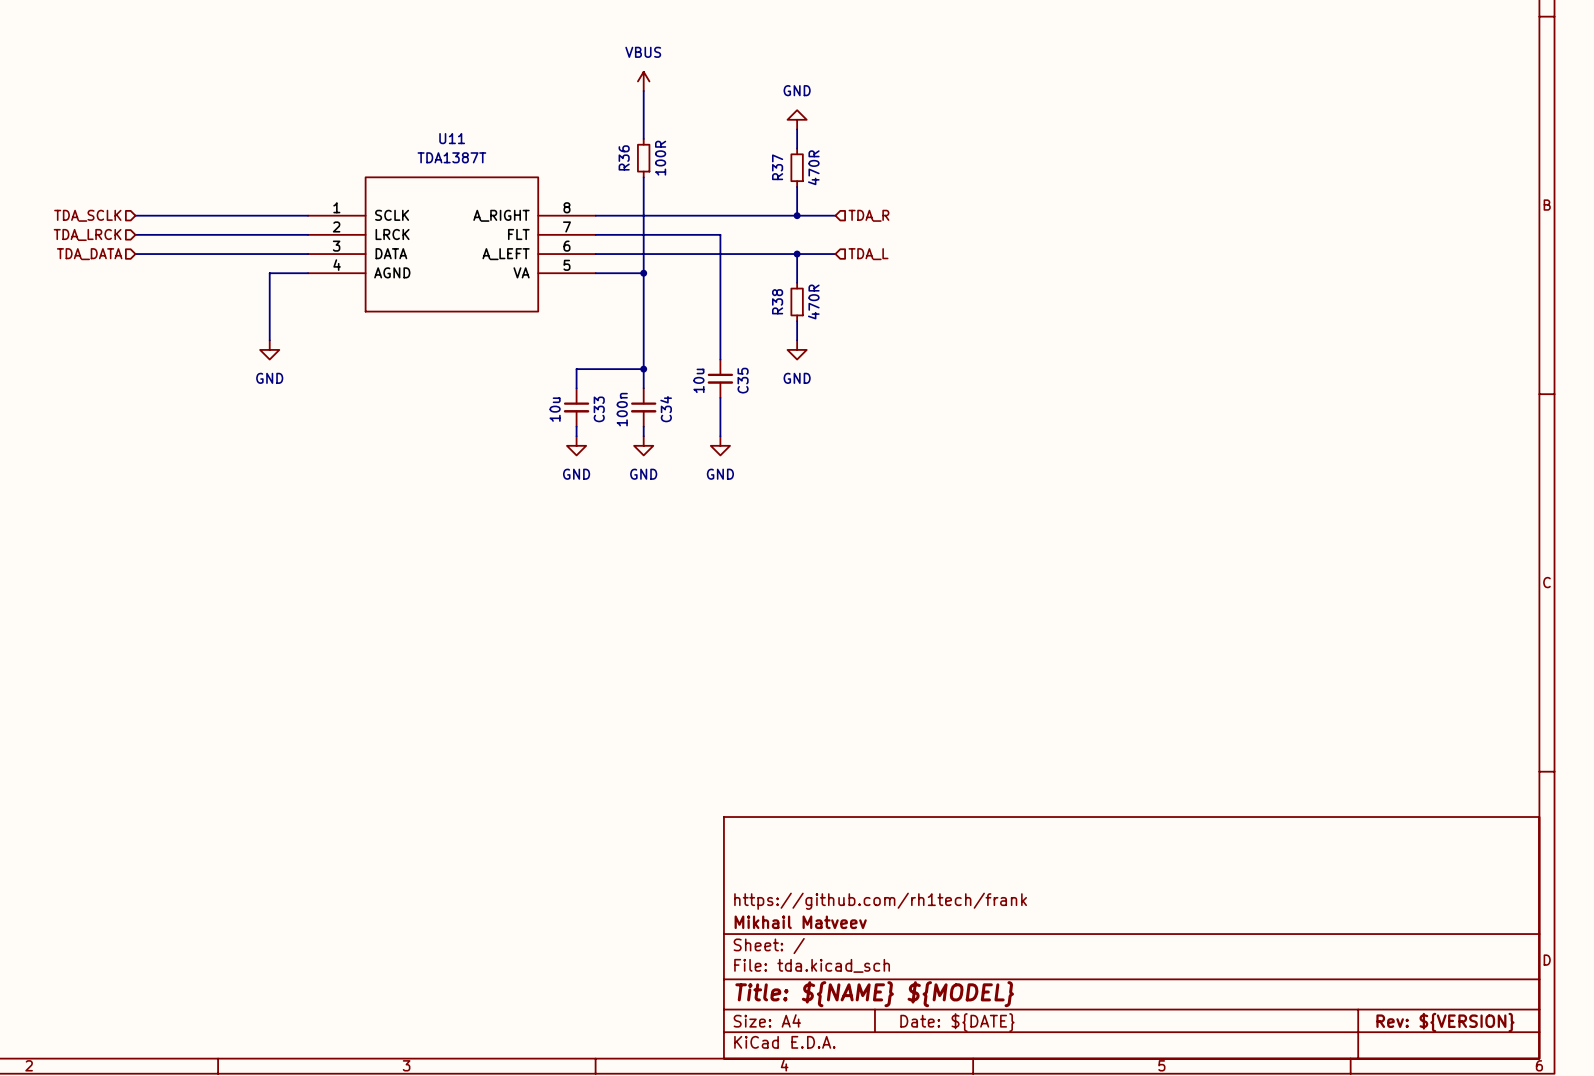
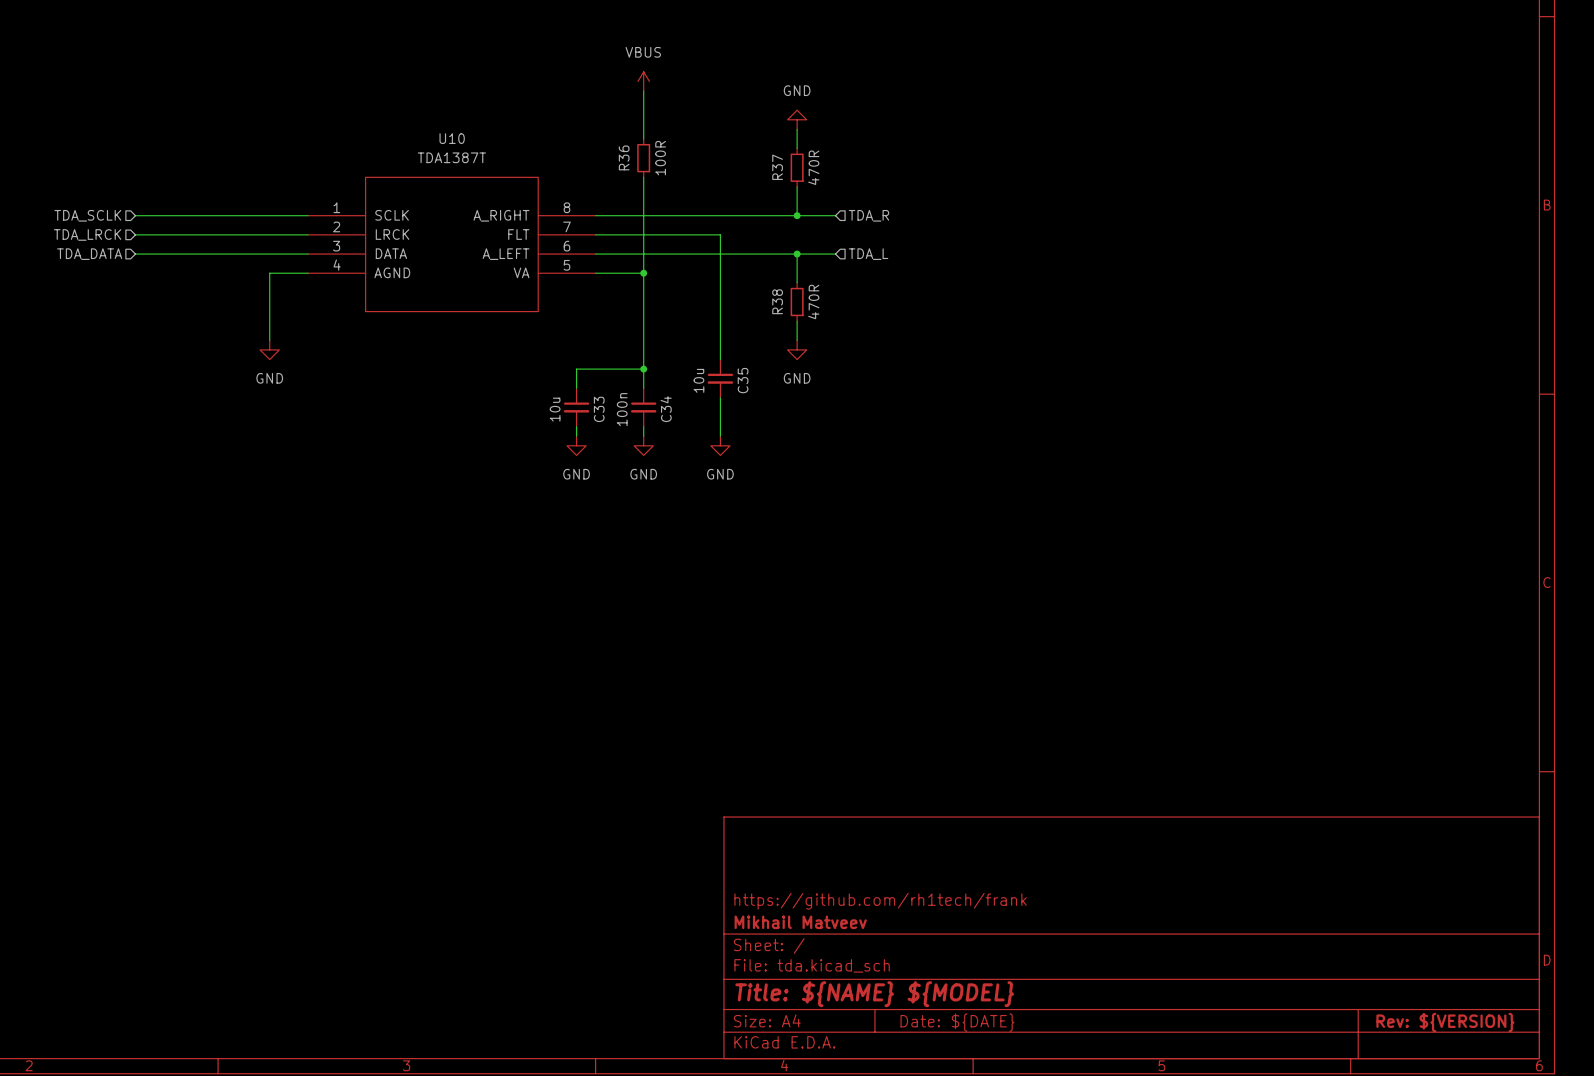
U11 name: U11 (452, 138) -> U10 (452, 138)

